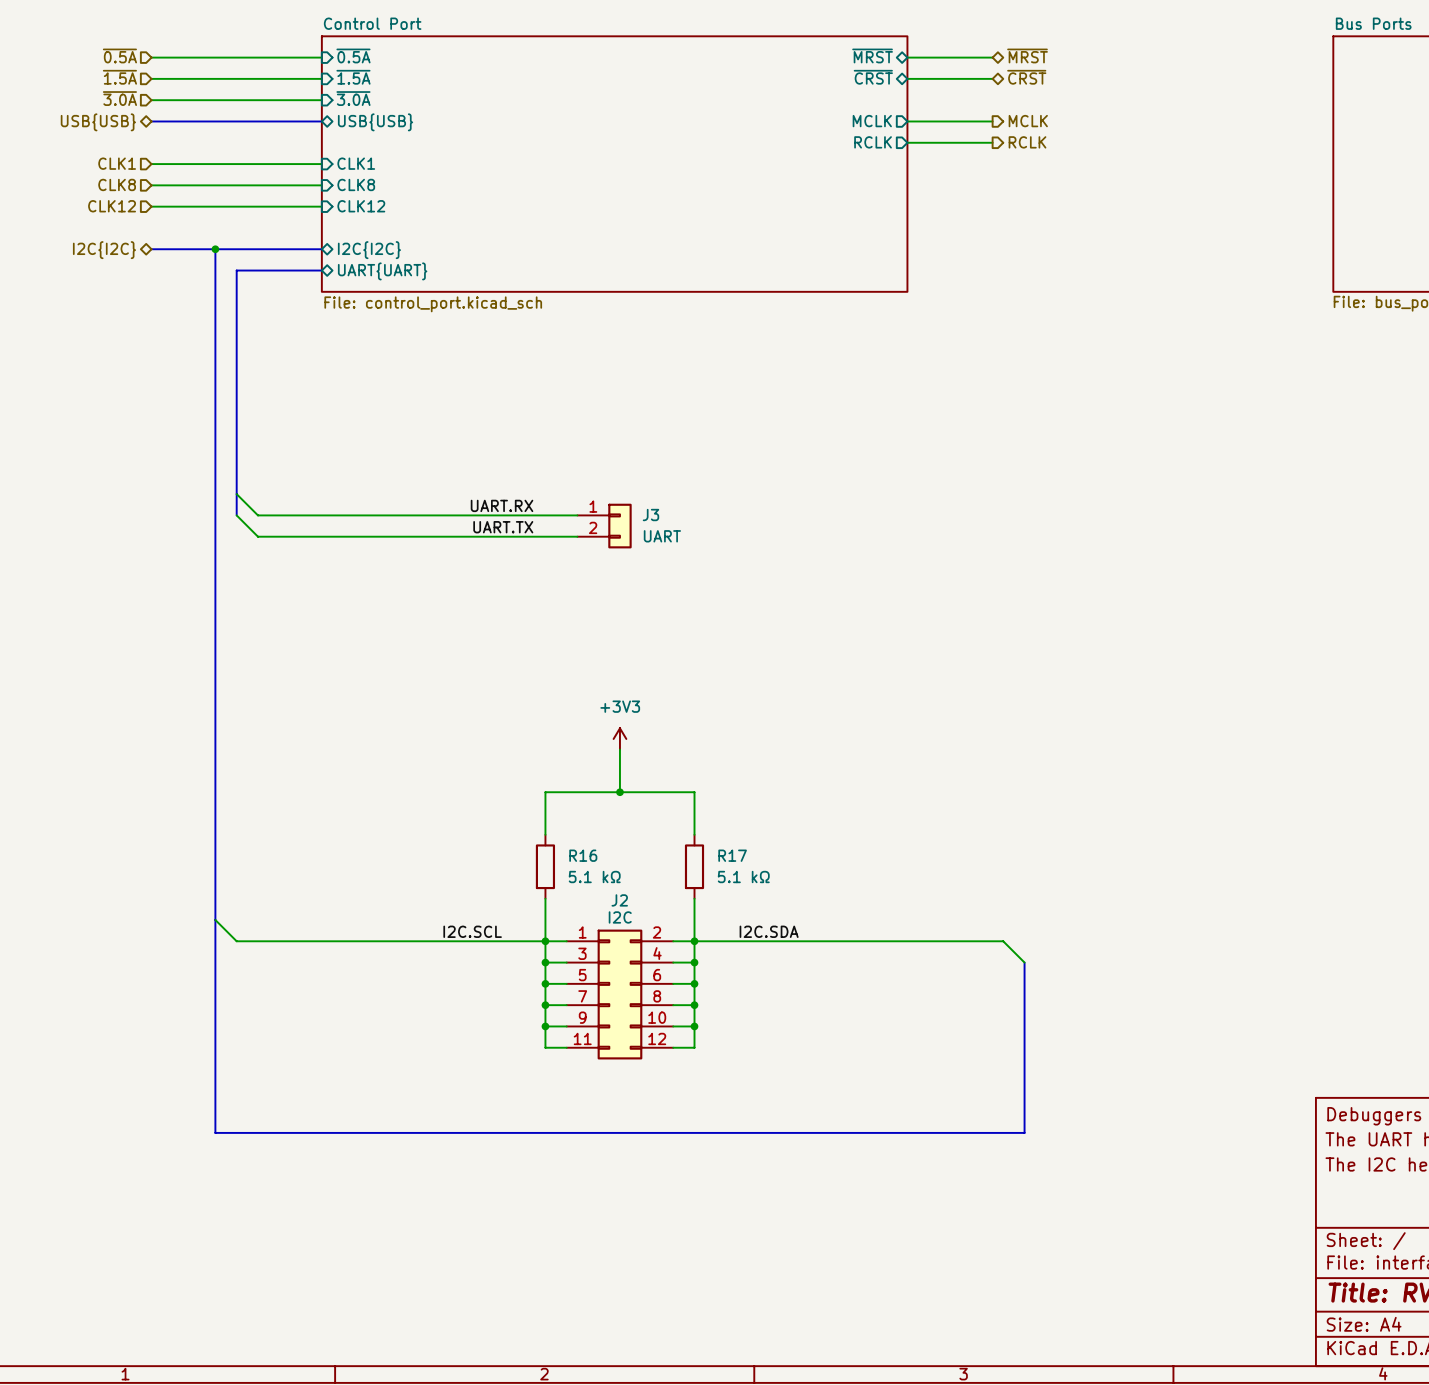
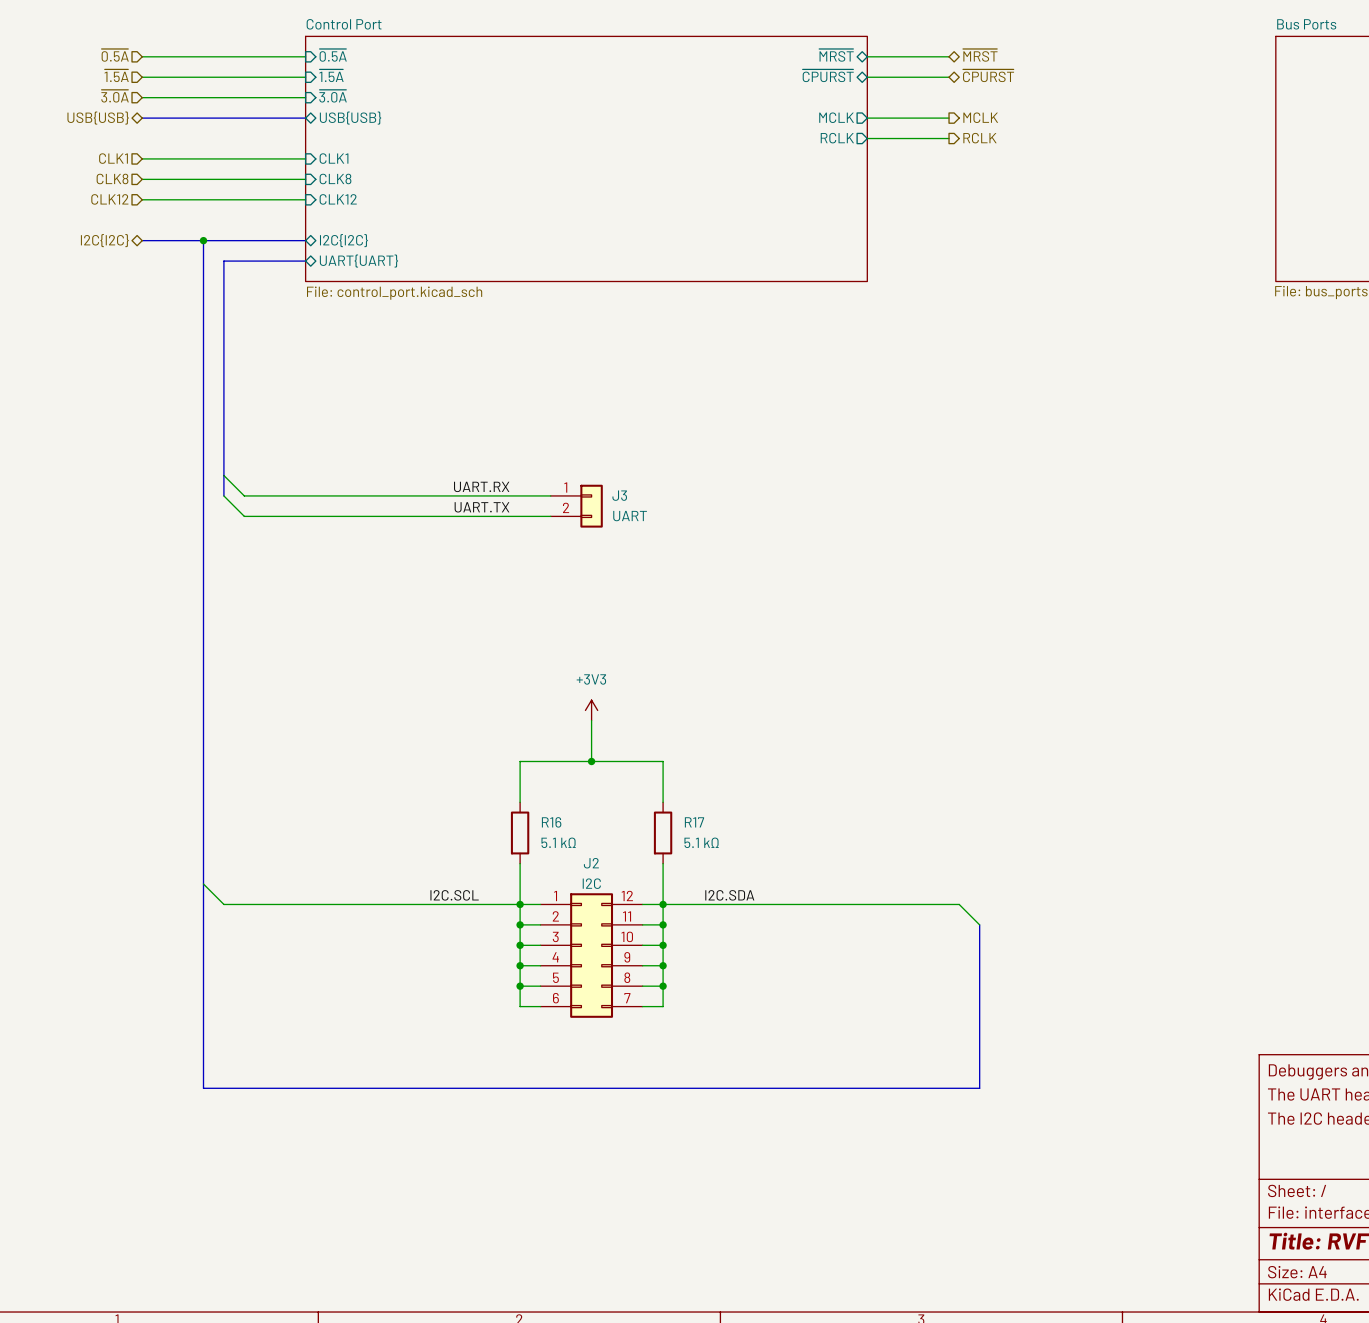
sheet pin: ~{CRST} (873, 77) -> ~{CPURST} (828, 75)
hierarchical label: ~{CRST} (1026, 77) -> ~{CPURST} (988, 75)
J2 symbol: [566, 929, 674, 1060] -> [540, 893, 643, 1018]

